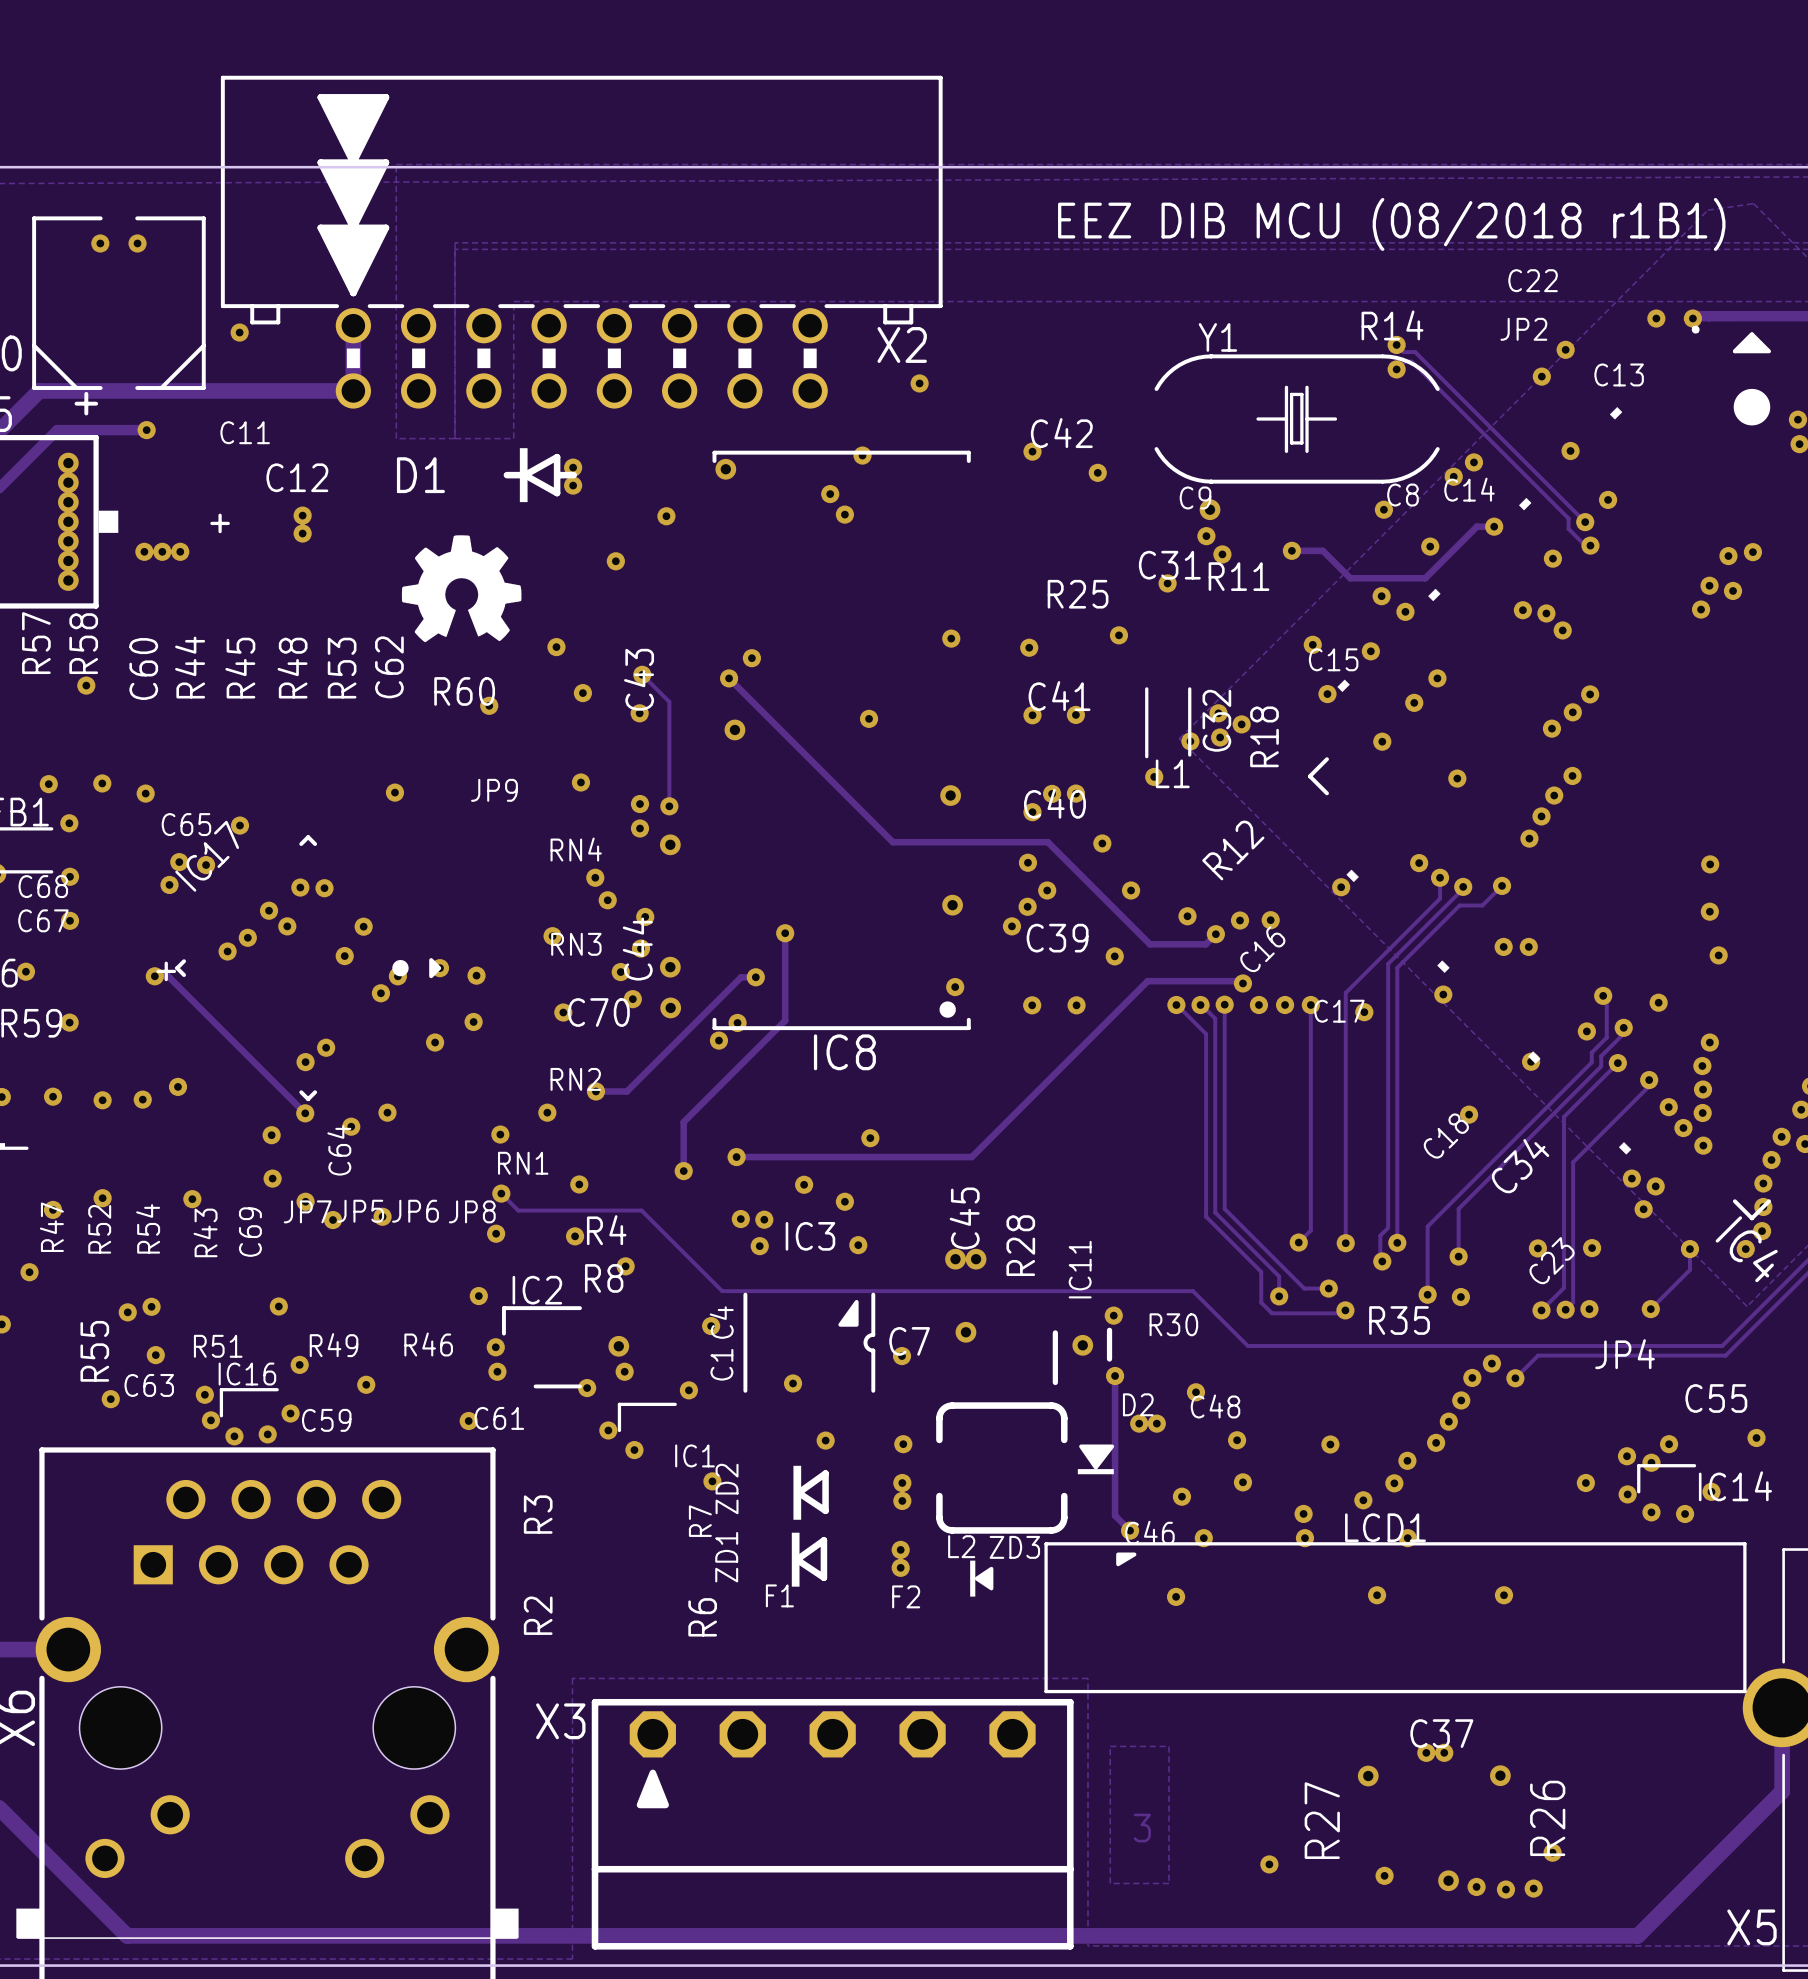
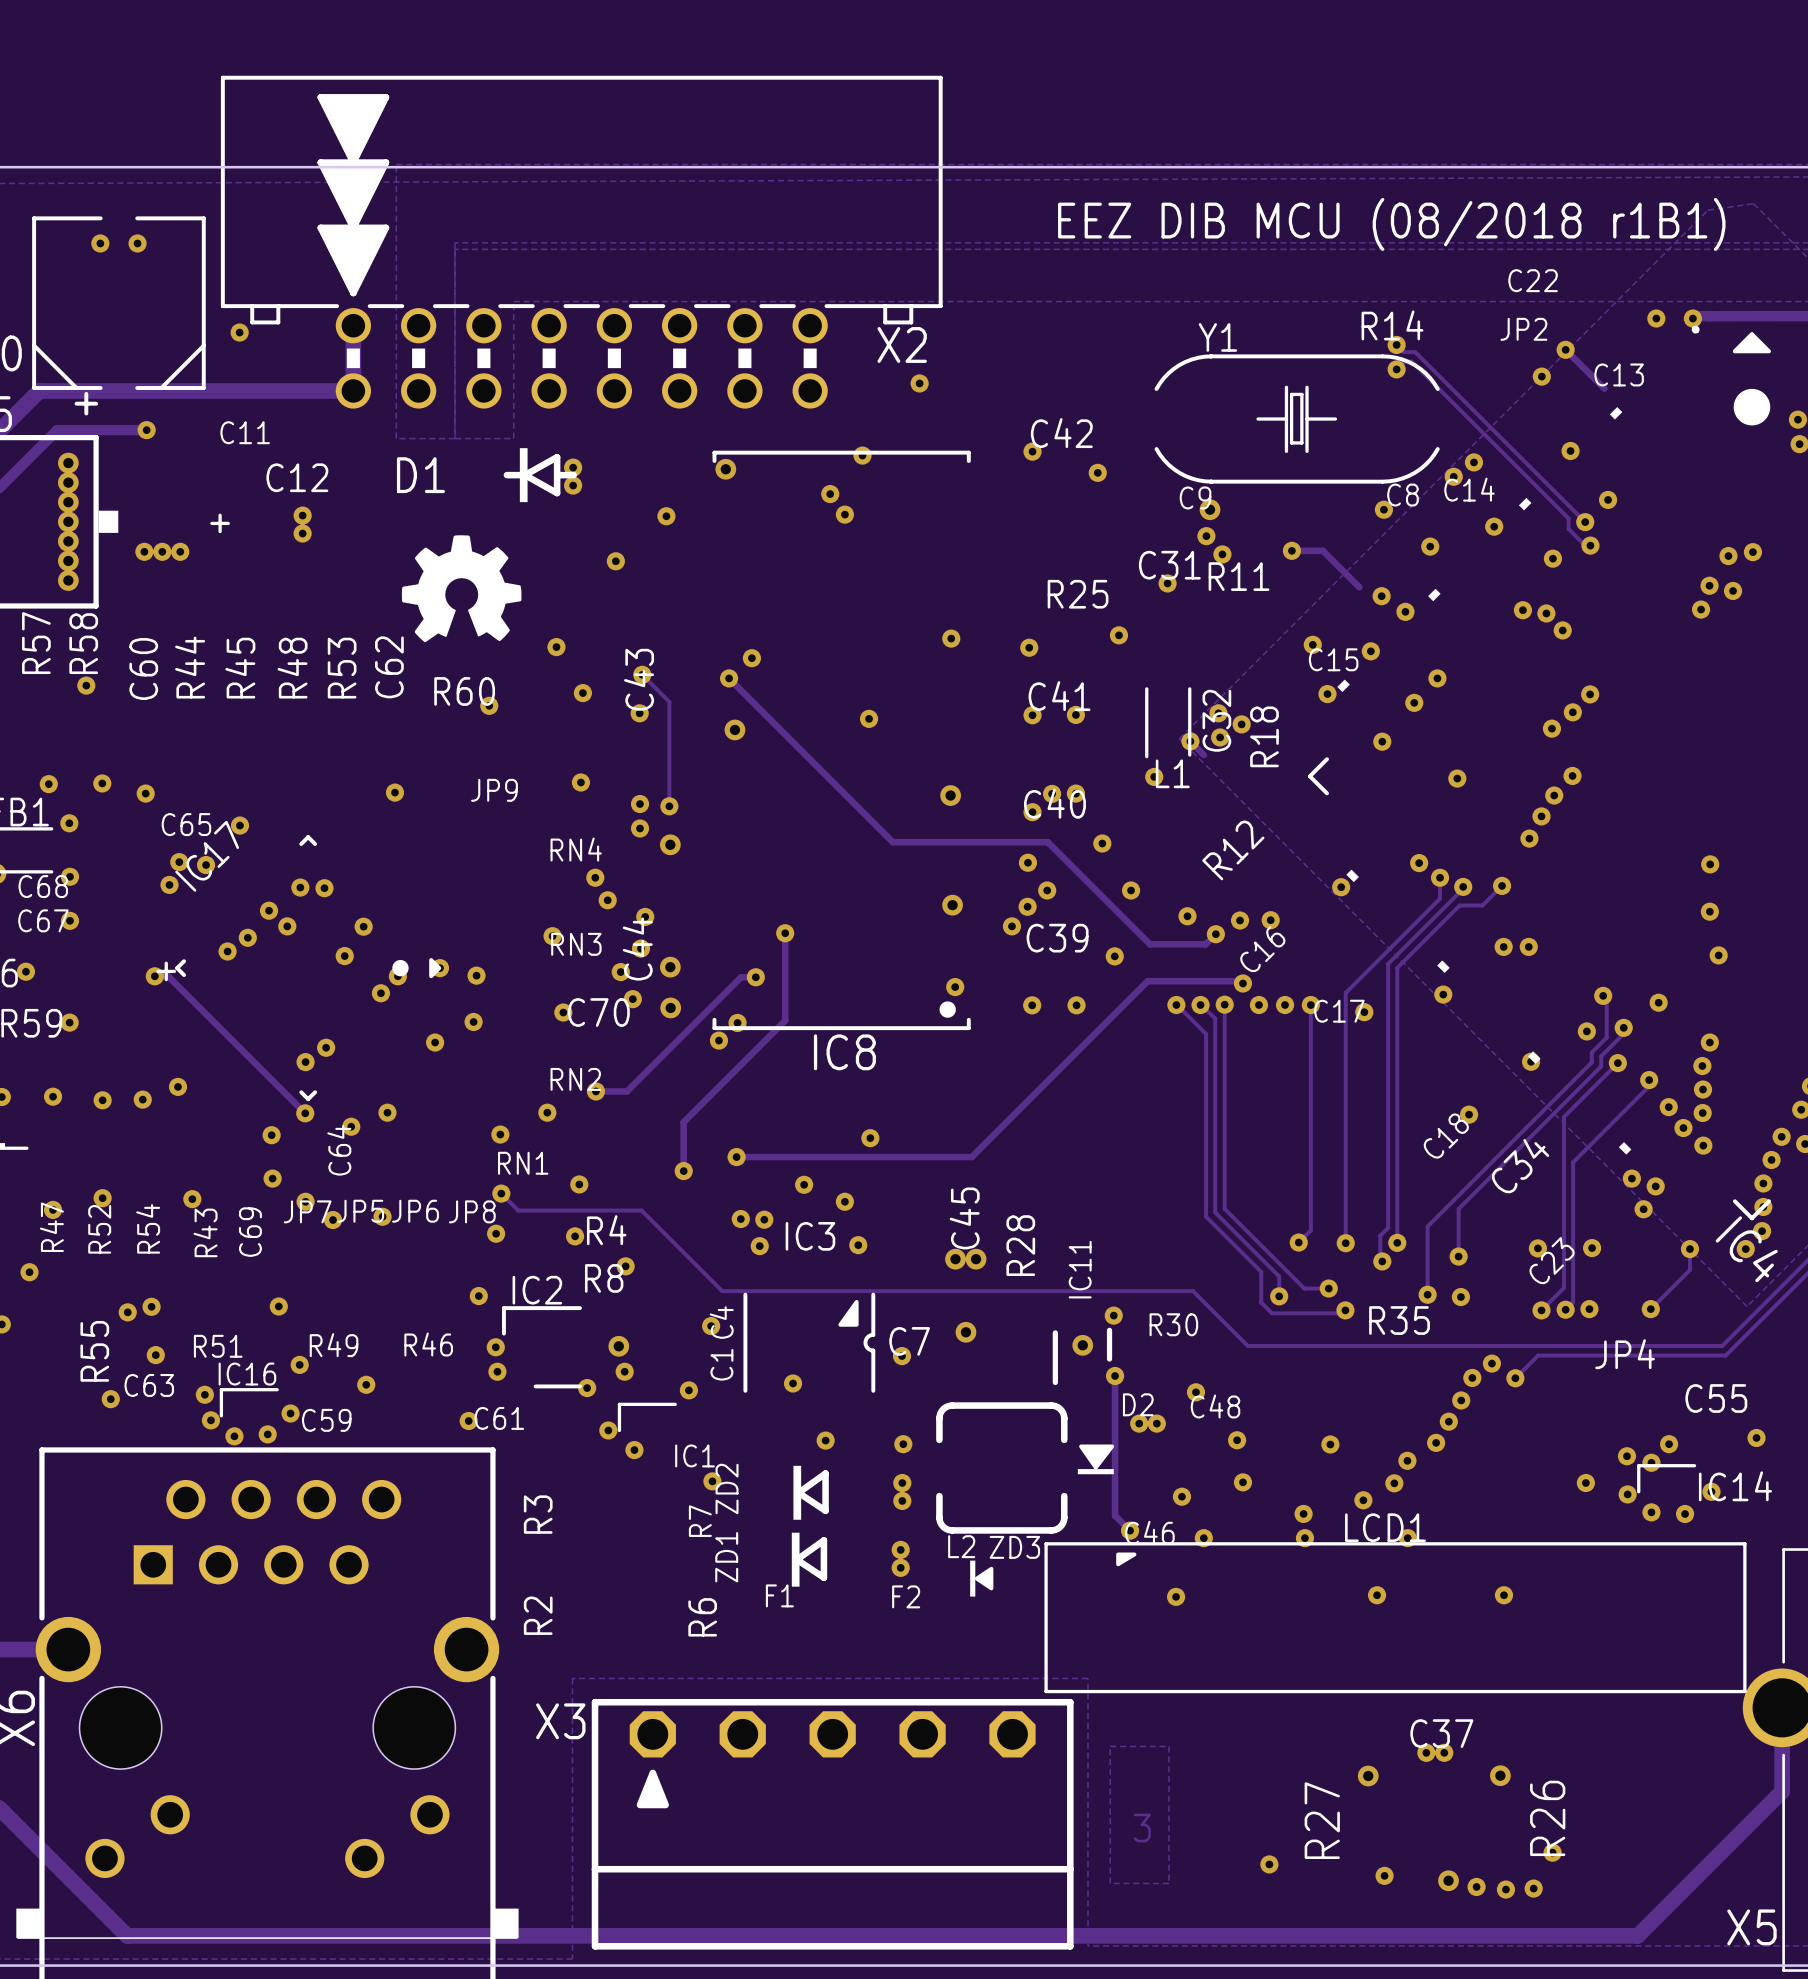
track: none -> (1565, 349) (1604, 388)
track: (1494, 526) (1476, 526) (1425, 578) (1350, 578) -> (1359, 587) (1350, 578)
track: none -> (1190, 741) (1203, 755)

